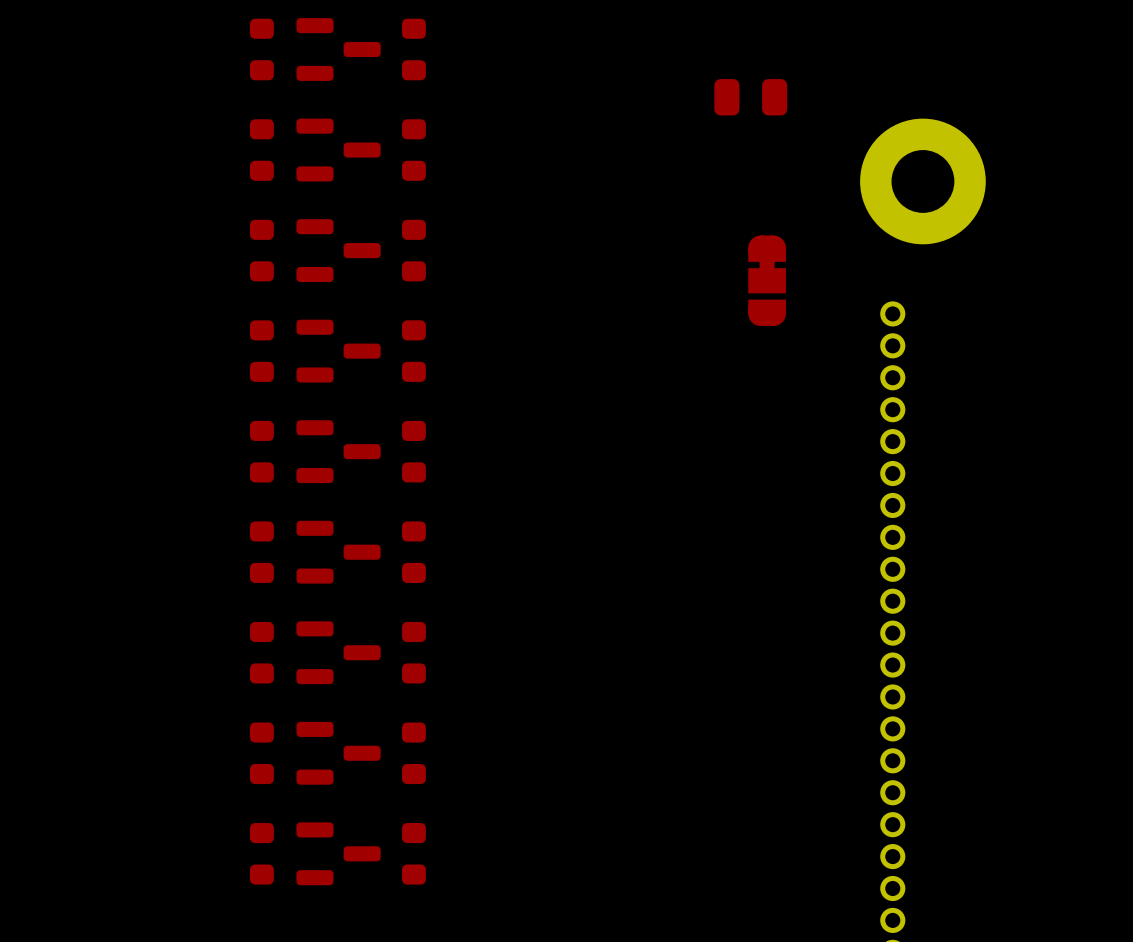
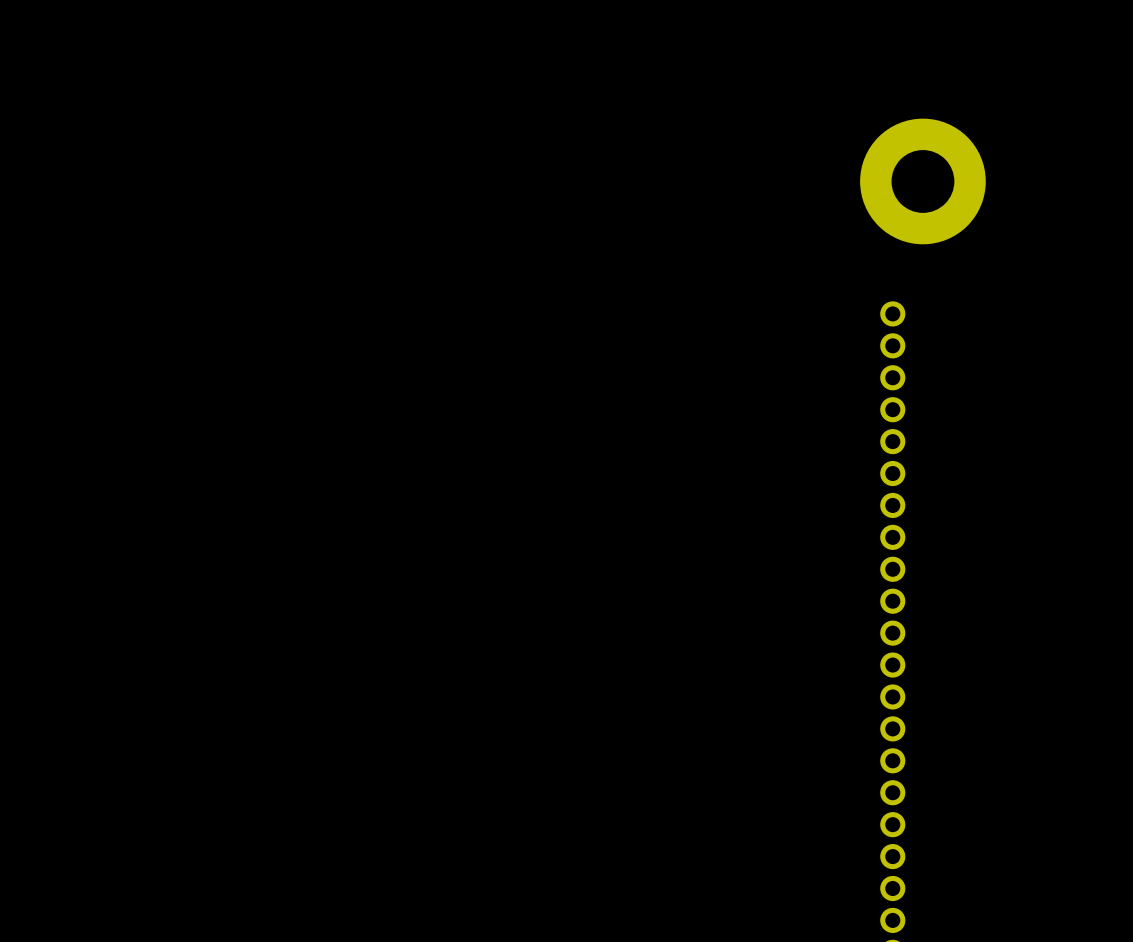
part: (261, 49) -> none
part: (338, 49) -> none
part: (413, 49) -> none
part: (750, 97) -> none
part: (261, 150) -> none
part: (338, 150) -> none
part: (413, 150) -> none
part: (261, 250) -> none
part: (338, 250) -> none
part: (413, 250) -> none
part: (767, 280) -> none
part: (261, 351) -> none
part: (338, 351) -> none
part: (413, 351) -> none
part: (261, 451) -> none
part: (338, 451) -> none
part: (413, 451) -> none
part: (261, 552) -> none
part: (338, 552) -> none
part: (413, 552) -> none
part: (261, 652) -> none
part: (338, 652) -> none
part: (413, 652) -> none
part: (261, 753) -> none
part: (338, 753) -> none
part: (413, 753) -> none
part: (261, 853) -> none
part: (338, 853) -> none
part: (413, 853) -> none

